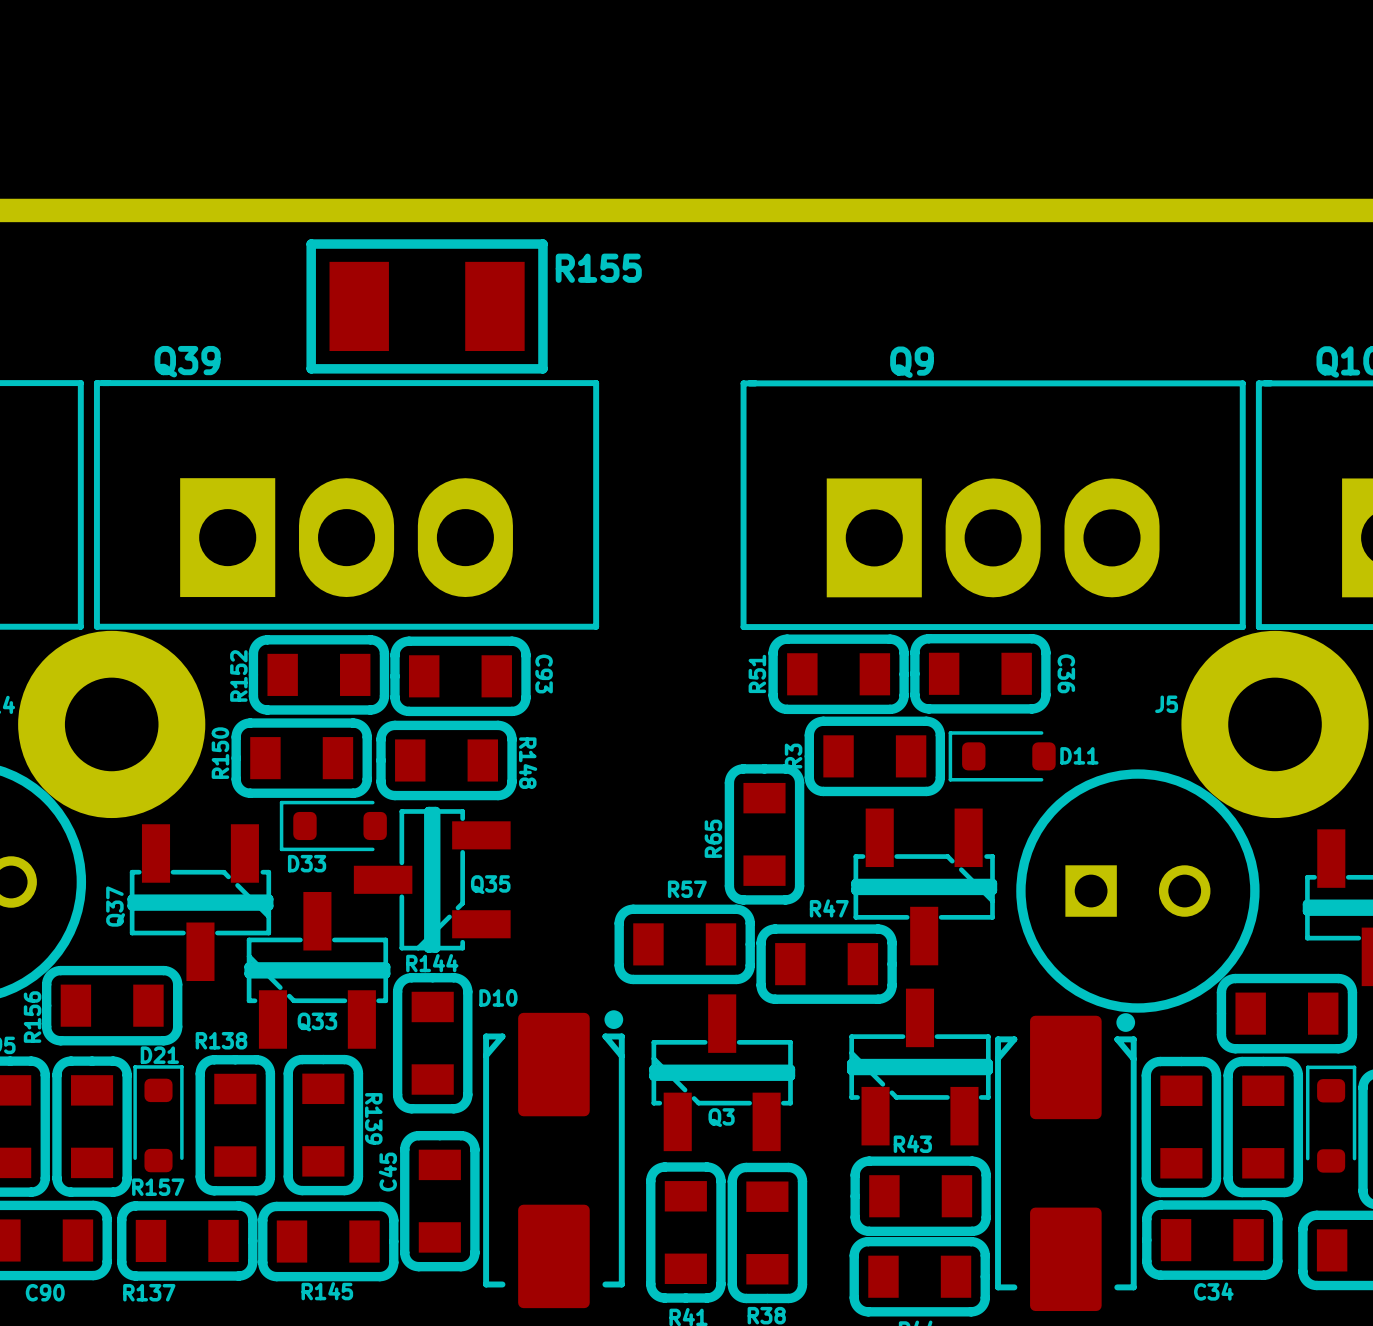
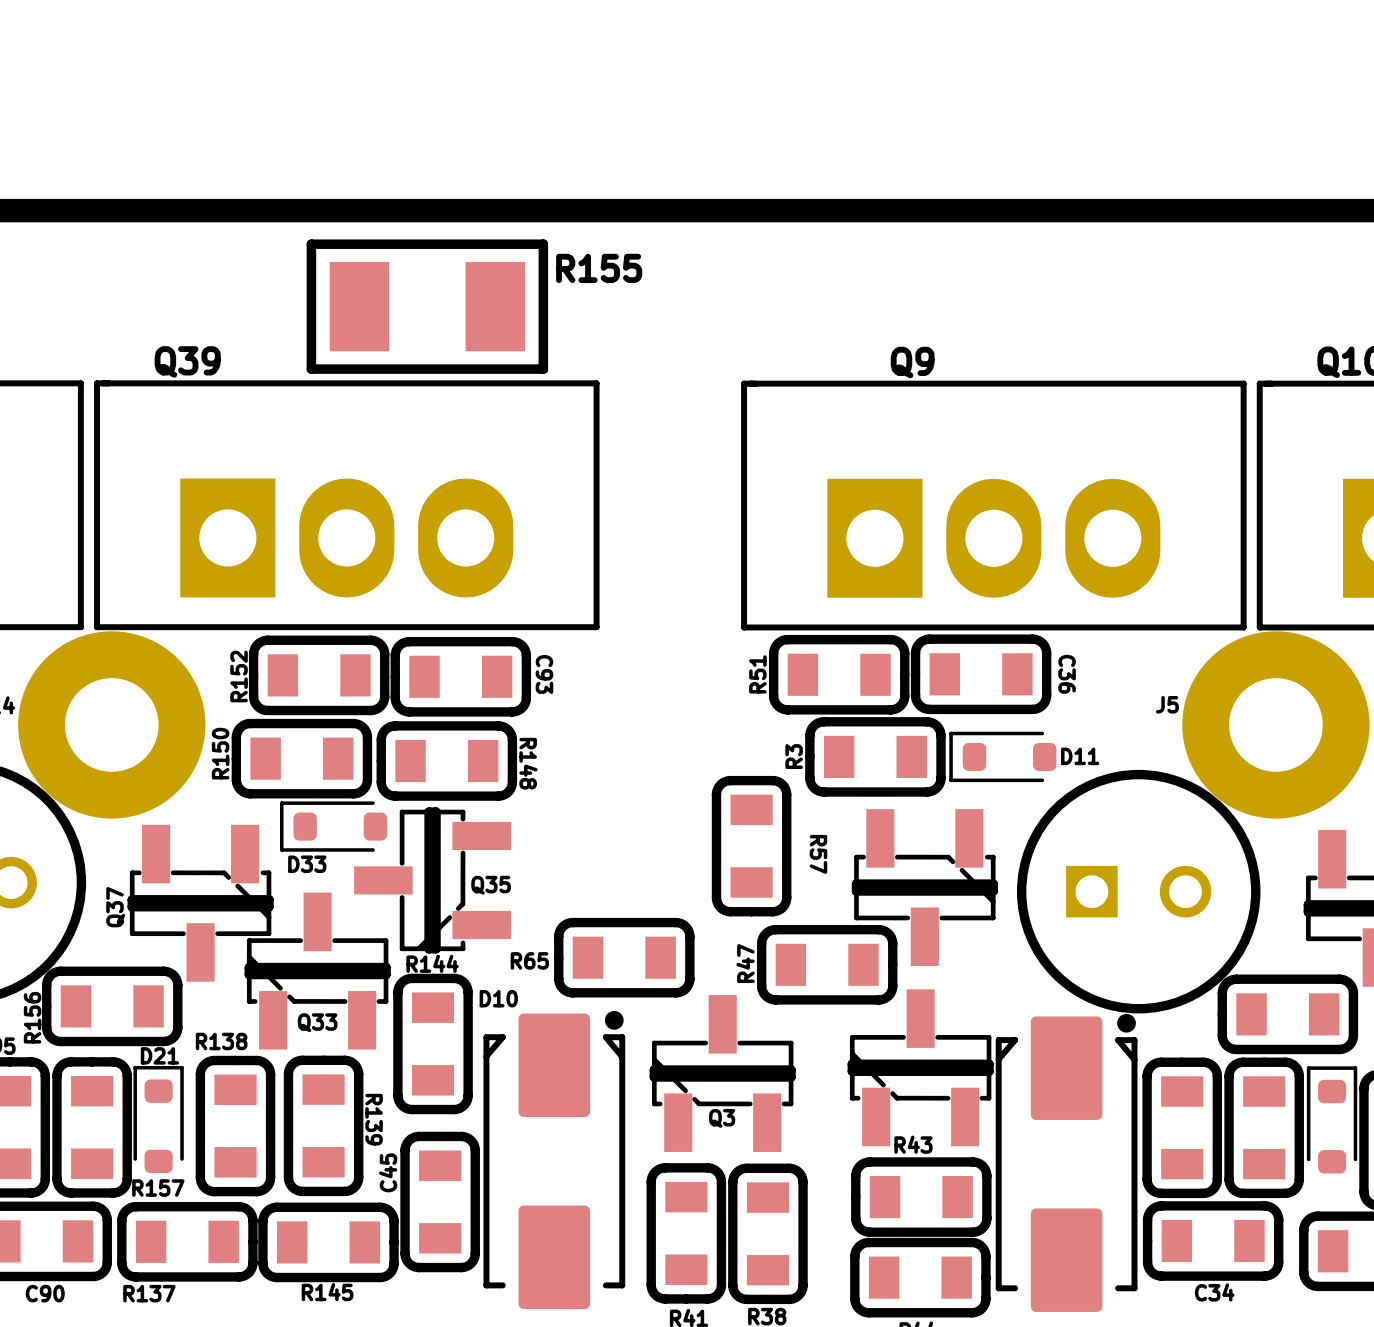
R65 rotation: 0° (764, 834) -> 90° counterclockwise (624, 957)
R65 position: (764, 834) -> (624, 957)
R47 name rotation: 0° (829, 908) -> 90° counterclockwise (745, 963)
R47 name position: R47 (829, 908) -> R47 (745, 963)
R57 rotation: 0° (684, 944) -> 90° clockwise (751, 846)
R57 position: (684, 944) -> (751, 846)

